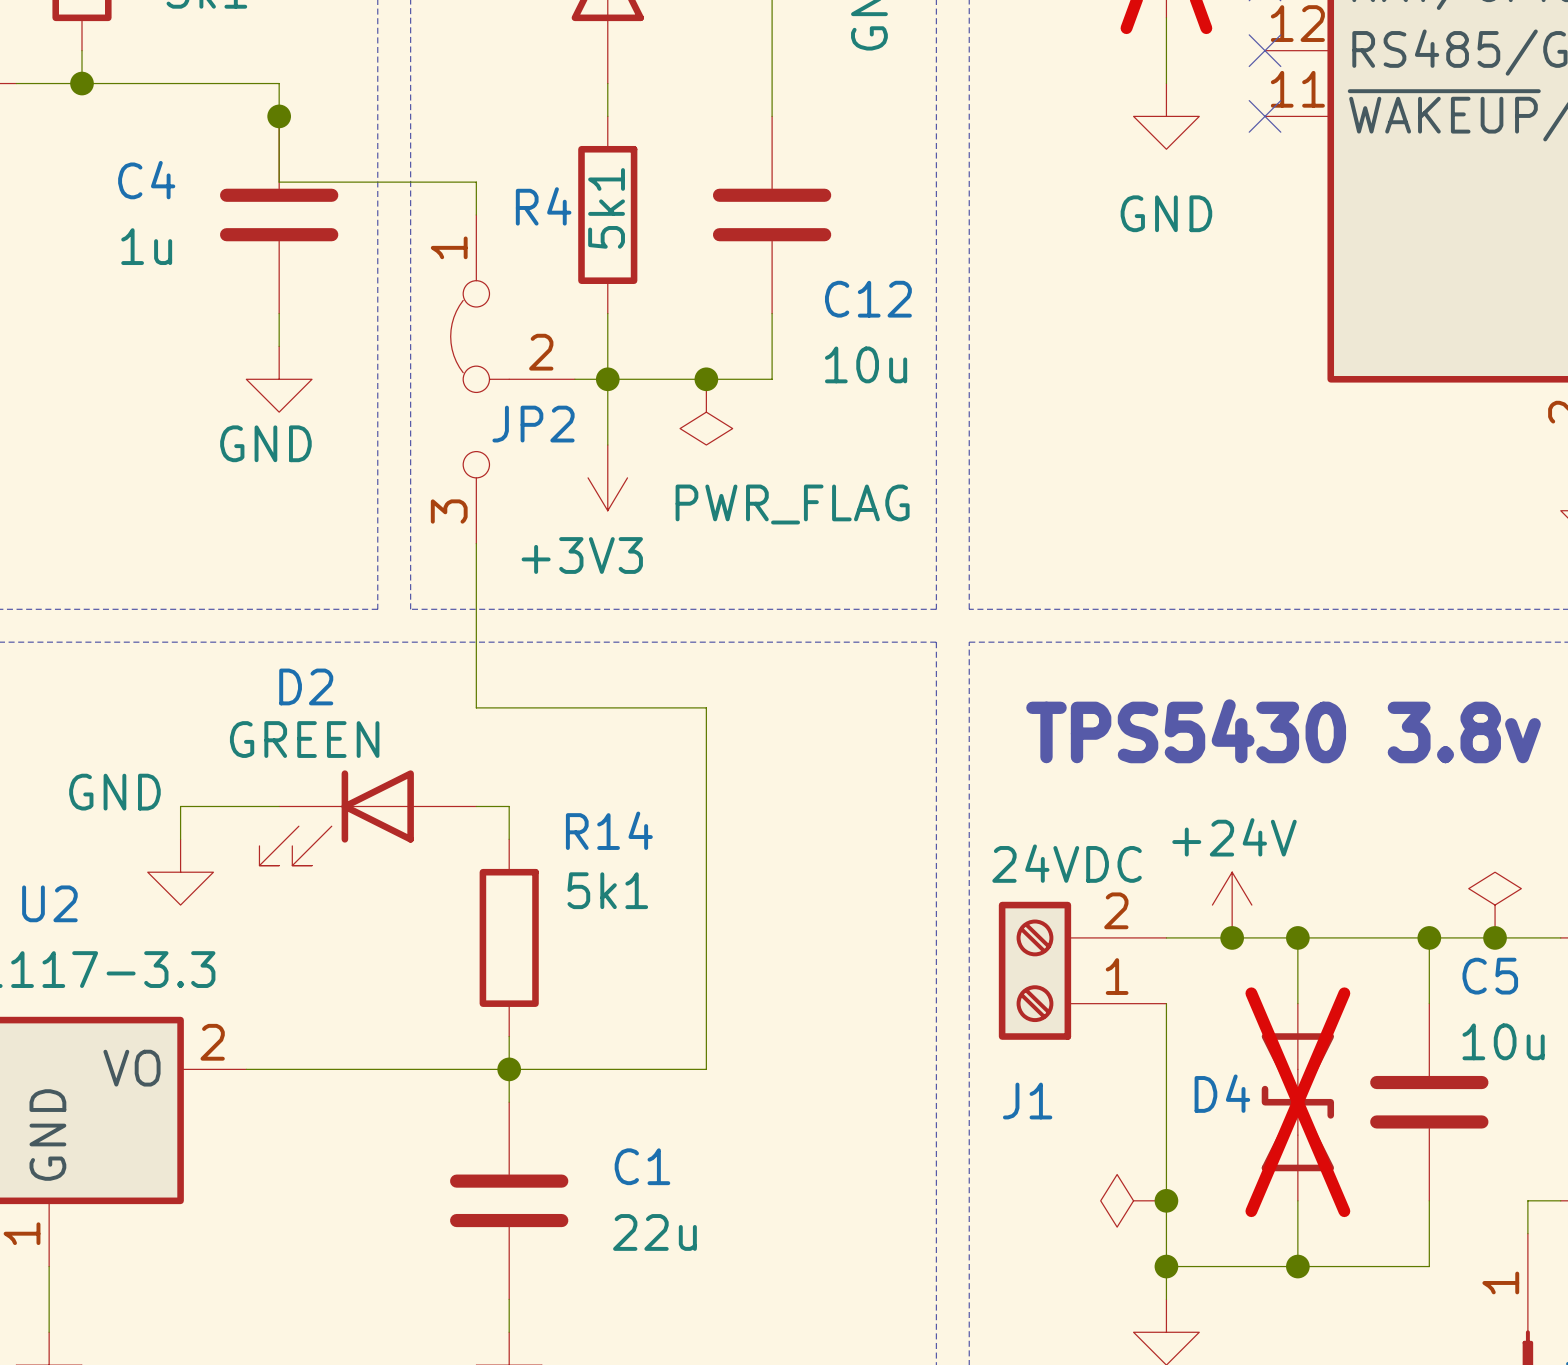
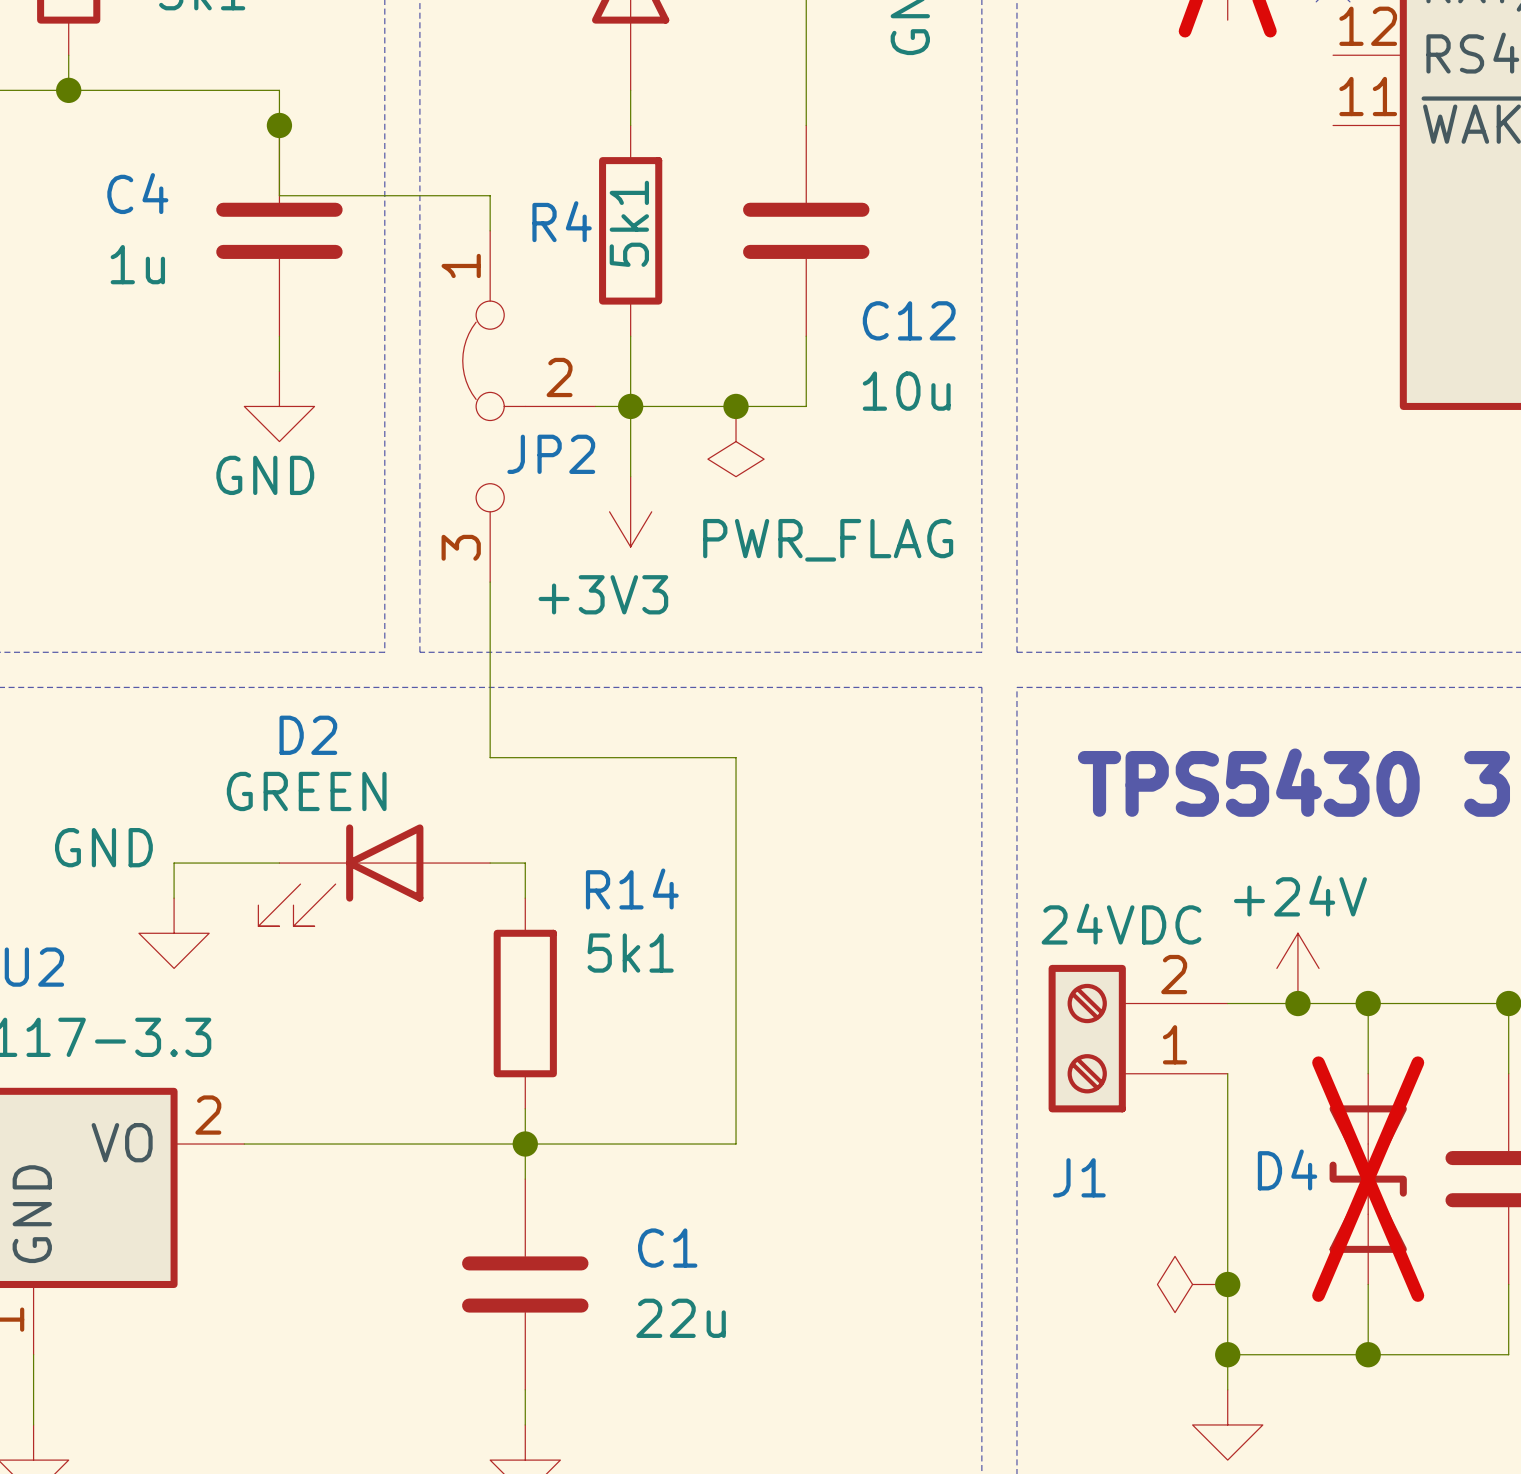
wire: (1166, 17) (1166, 83) -> none
no-connect mark: (1265, 50) -> none
power symbol: GND (1166, 116) -> none
no-connect mark: (1265, 116) -> none

